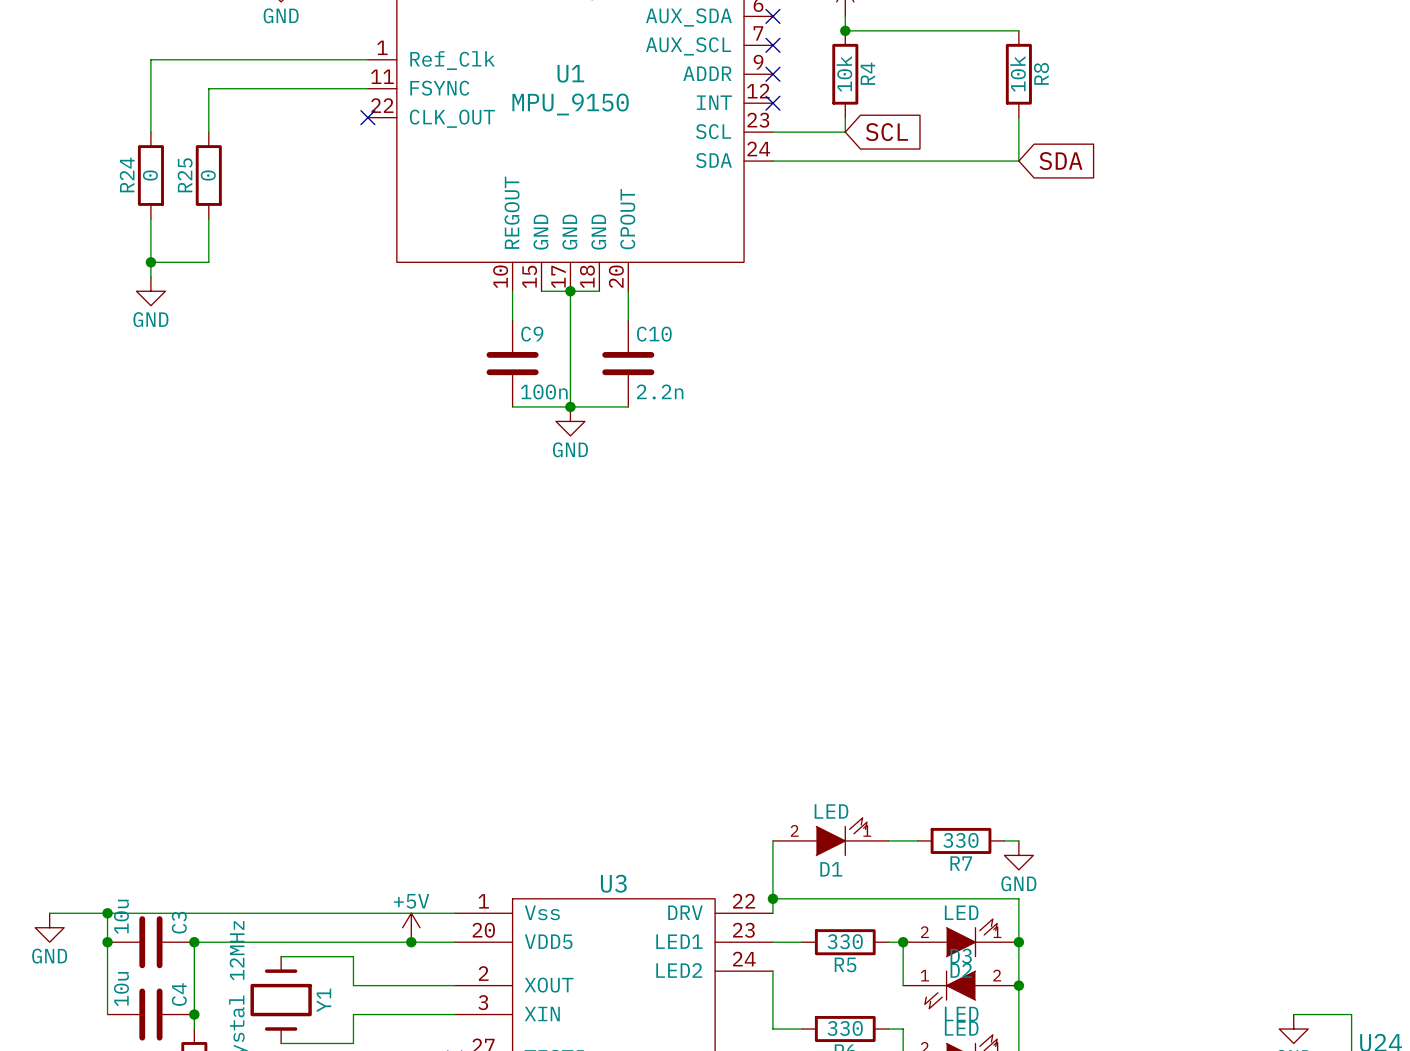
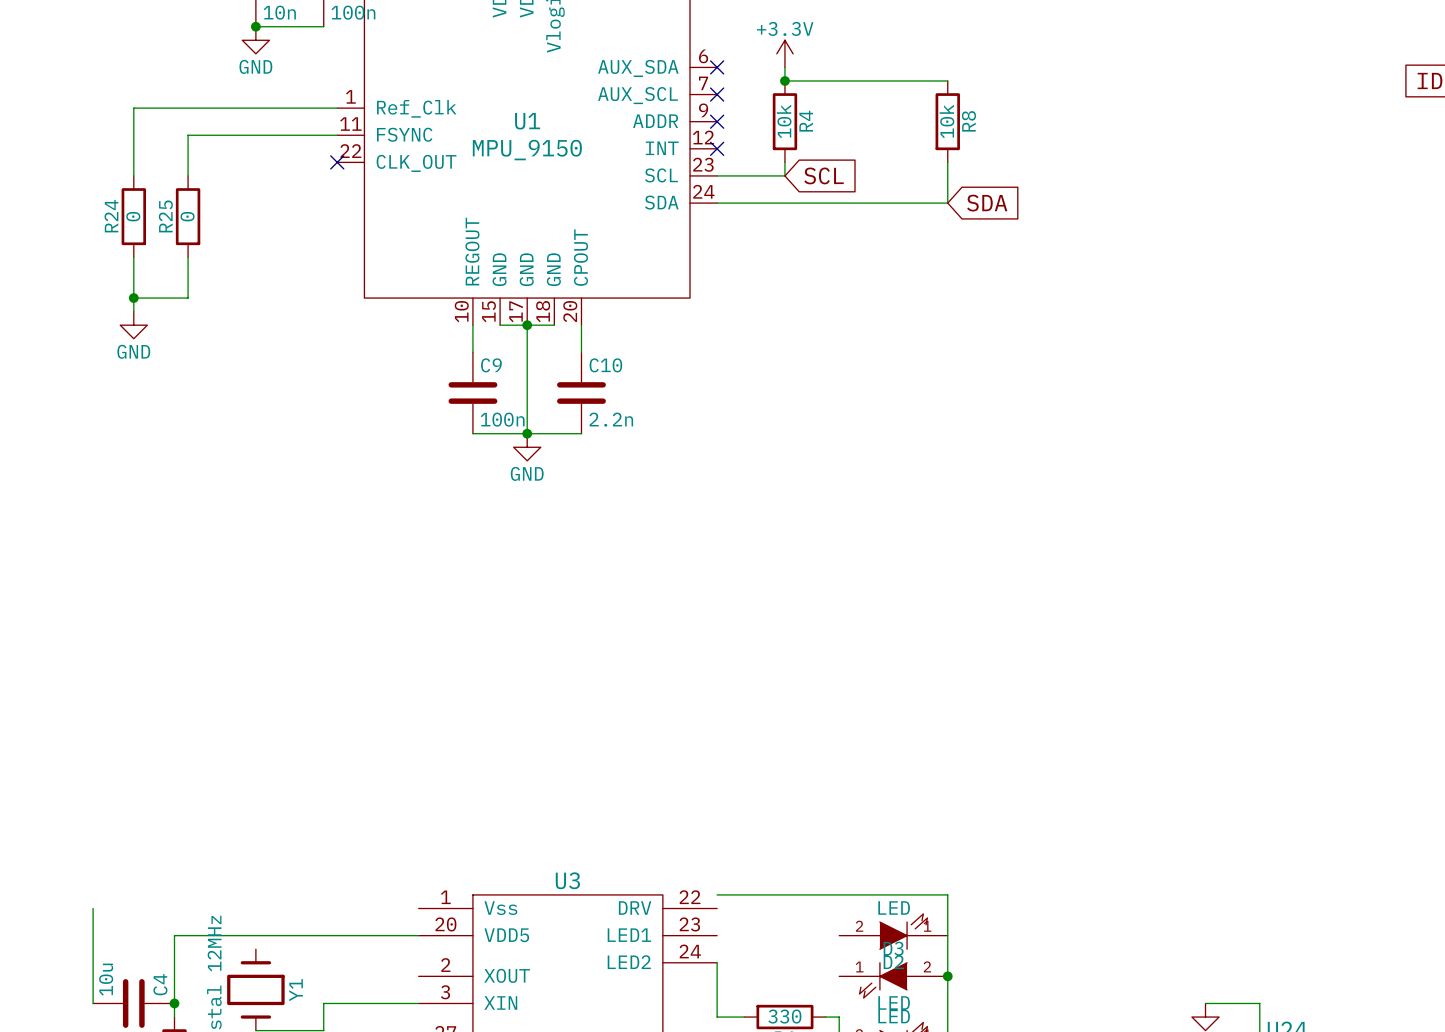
D1: LED (830, 836) -> none
wire: (772, 840) (772, 913) -> none
wire: (888, 840) (917, 840) -> none
R7: 330 (961, 840) -> none
wire: (1004, 840) (1018, 840) -> none
power symbol: GND (1018, 855) -> none
junction: (772, 898) -> none
wire: (49, 913) (454, 913) -> none
junction: (107, 913) -> none
power symbol: GND (49, 927) -> none
power symbol: +5V (411, 927) -> none
junction: (107, 942) -> none
C3: 10u (150, 942) -> none
junction: (194, 942) -> none
junction: (411, 942) -> none
wire: (772, 942) (801, 942) -> none
R5: 330 (845, 942) -> none
wire: (888, 942) (903, 942) (903, 985) -> none
junction: (903, 942) -> none
junction: (1018, 942) -> none
wire: (281, 956) (353, 956) (353, 985) (454, 985) -> none

